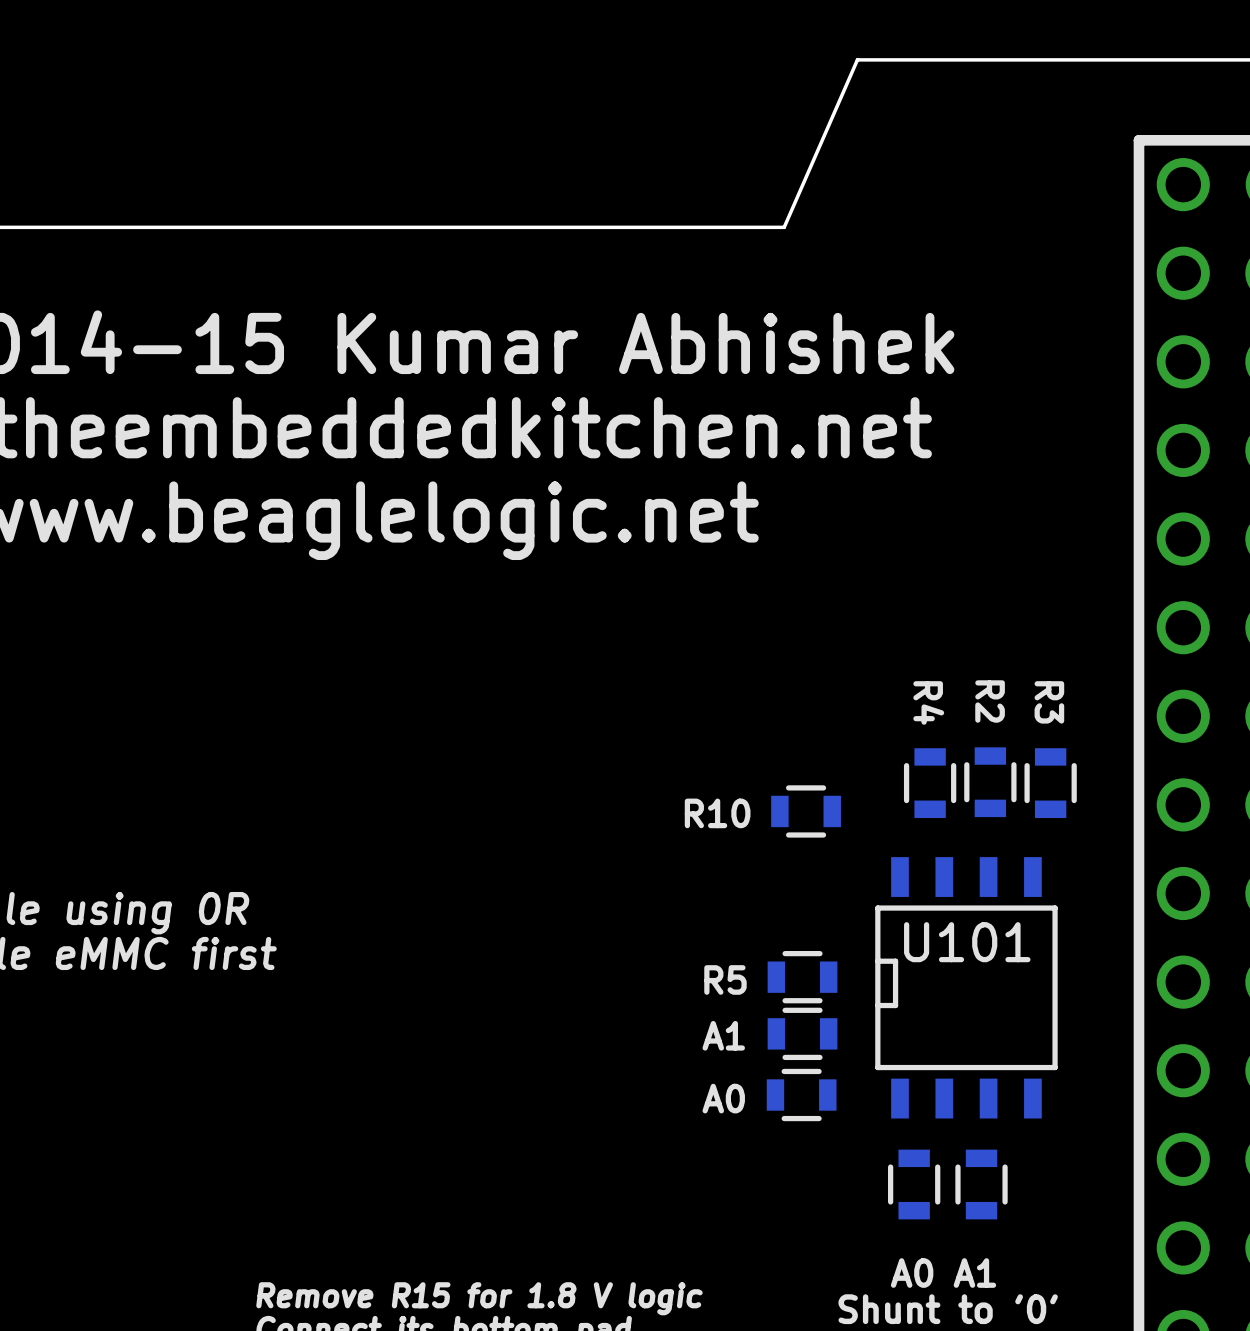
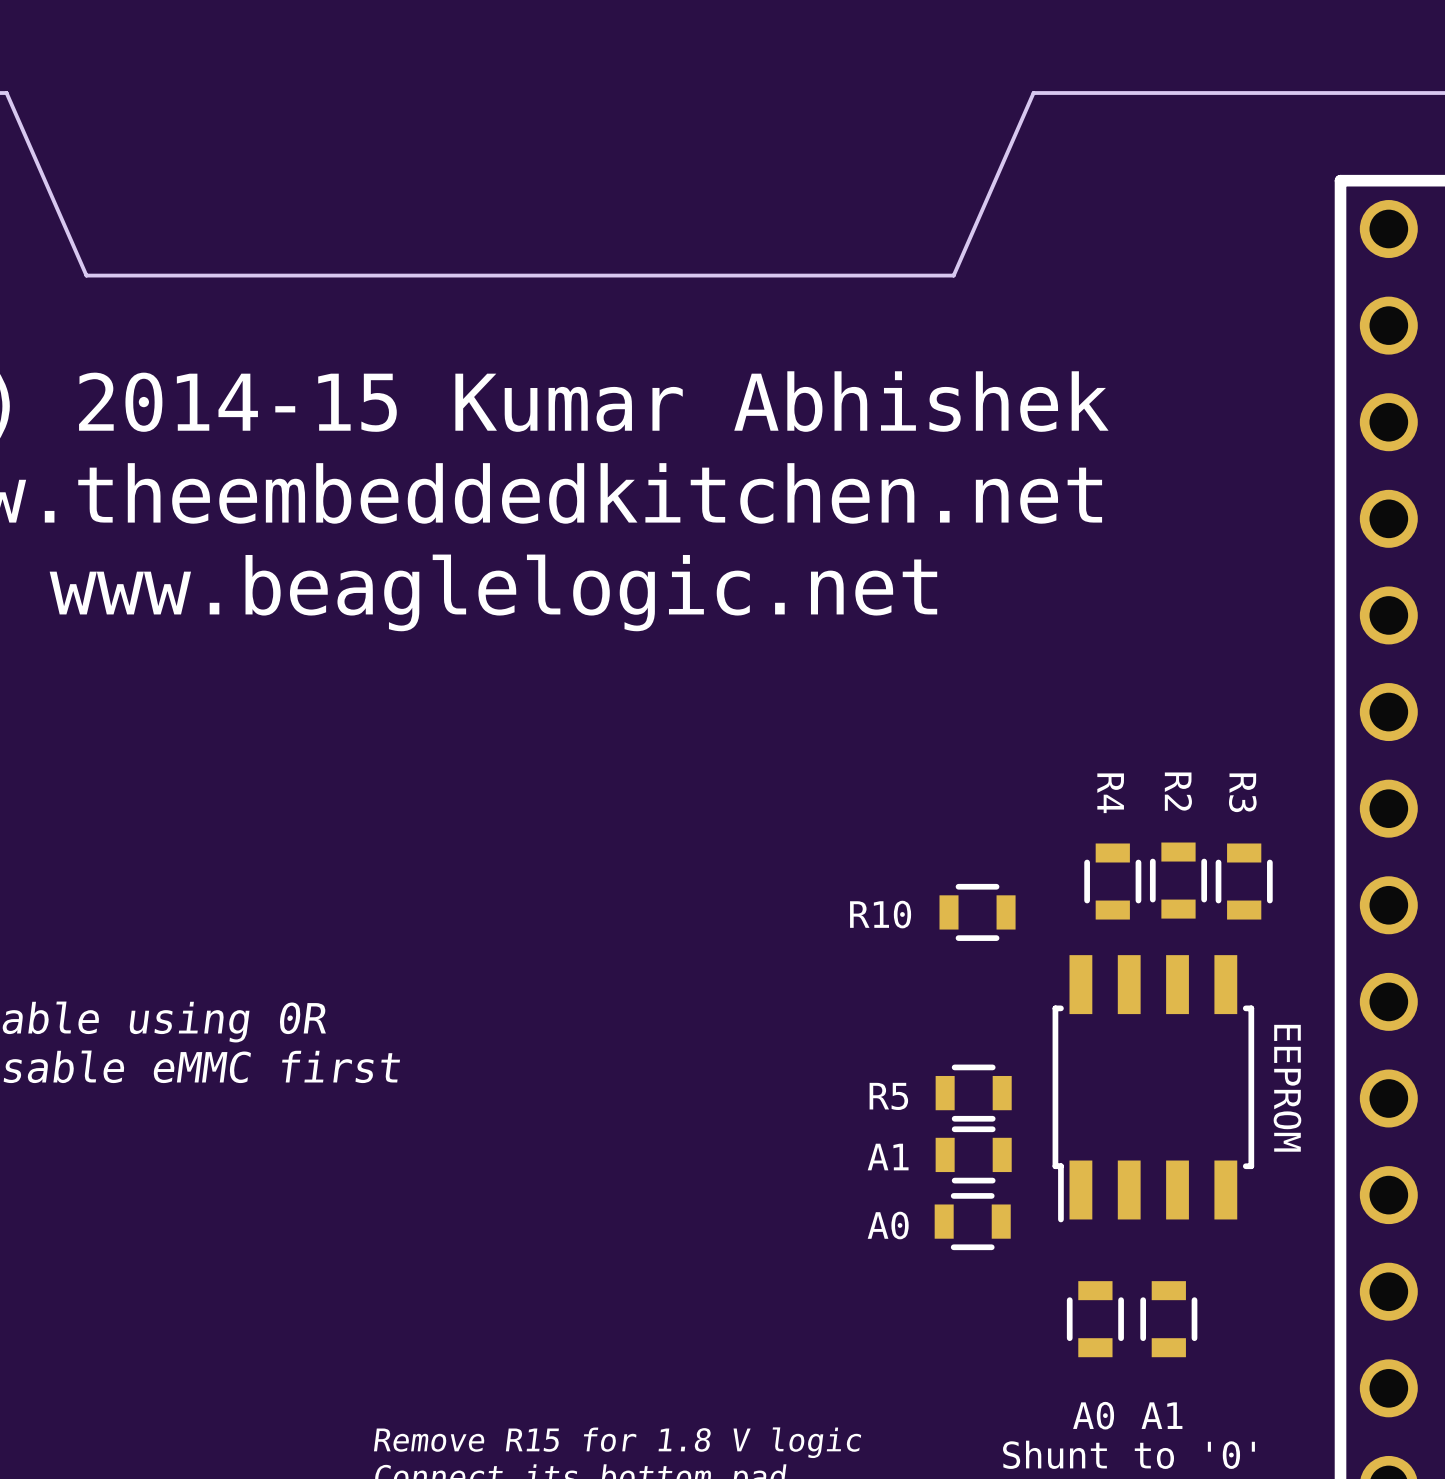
part: none -> EEPROM (1153, 1088)
U101: (966, 987) -> none

